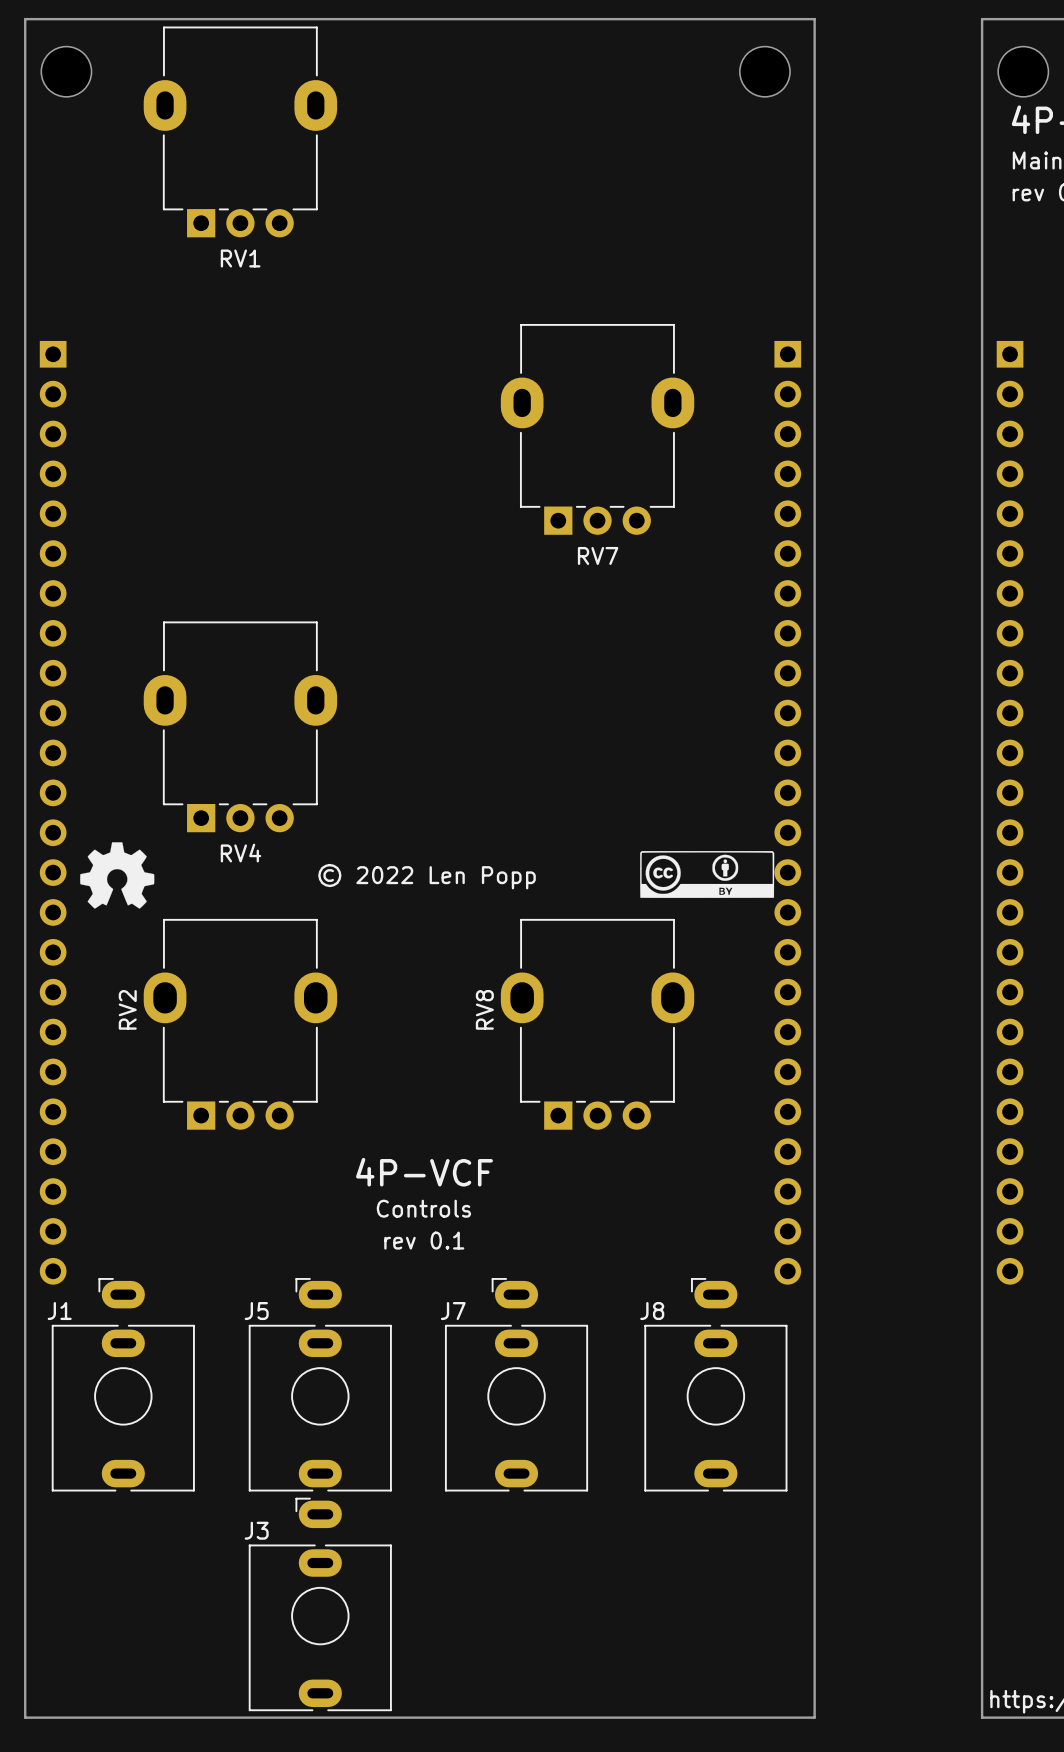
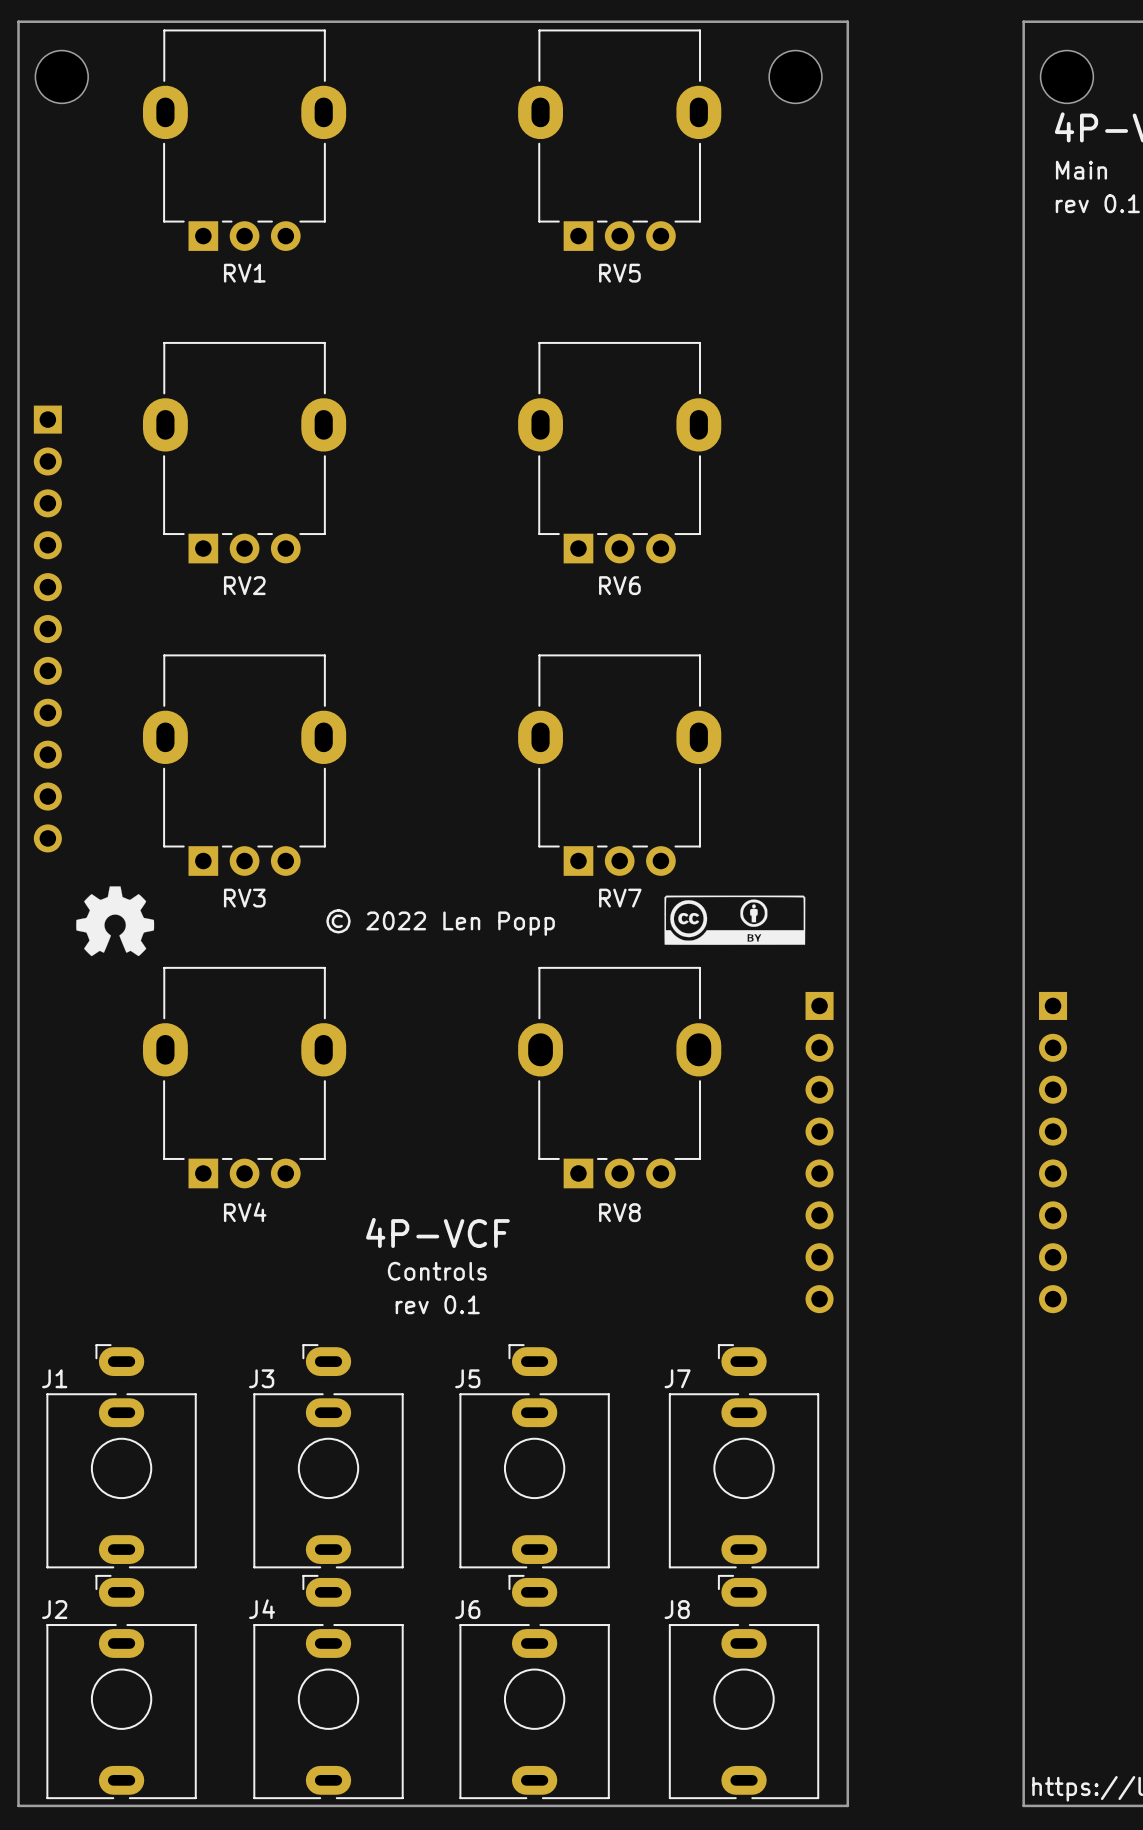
RV5: none -> (619, 140)
RV7 name: RV7 (598, 555) -> RV6 (619, 585)
part: none -> (47, 629)
RV7: none -> (619, 765)
part: (53, 812) -> none
part: (787, 812) -> none
part: (1010, 812) -> none
RV4 name: RV4 (240, 853) -> RV3 (244, 898)
RV2 footprint: [143, 918, 338, 1130] -> [143, 341, 347, 564]
RV2 name position: RV2 (127, 1009) -> RV2 (244, 585)
RV8 name rotation: 0° (484, 1009) -> 90° clockwise (619, 1212)
RV8 name position: RV8 (484, 1009) -> RV8 (619, 1212)
RV4: none -> (244, 1077)
part: none -> (819, 1152)
part: none -> (1053, 1152)
J5 name: J5 (256, 1311) -> J3 (261, 1378)
J7 name: J7 (453, 1311) -> J5 (467, 1378)
J8 name: J8 (652, 1311) -> J7 (677, 1378)
J3 name: J3 (256, 1530) -> J4 (262, 1609)
J2: none -> (121, 1687)
J6: none -> (534, 1687)
J8: none -> (744, 1687)

